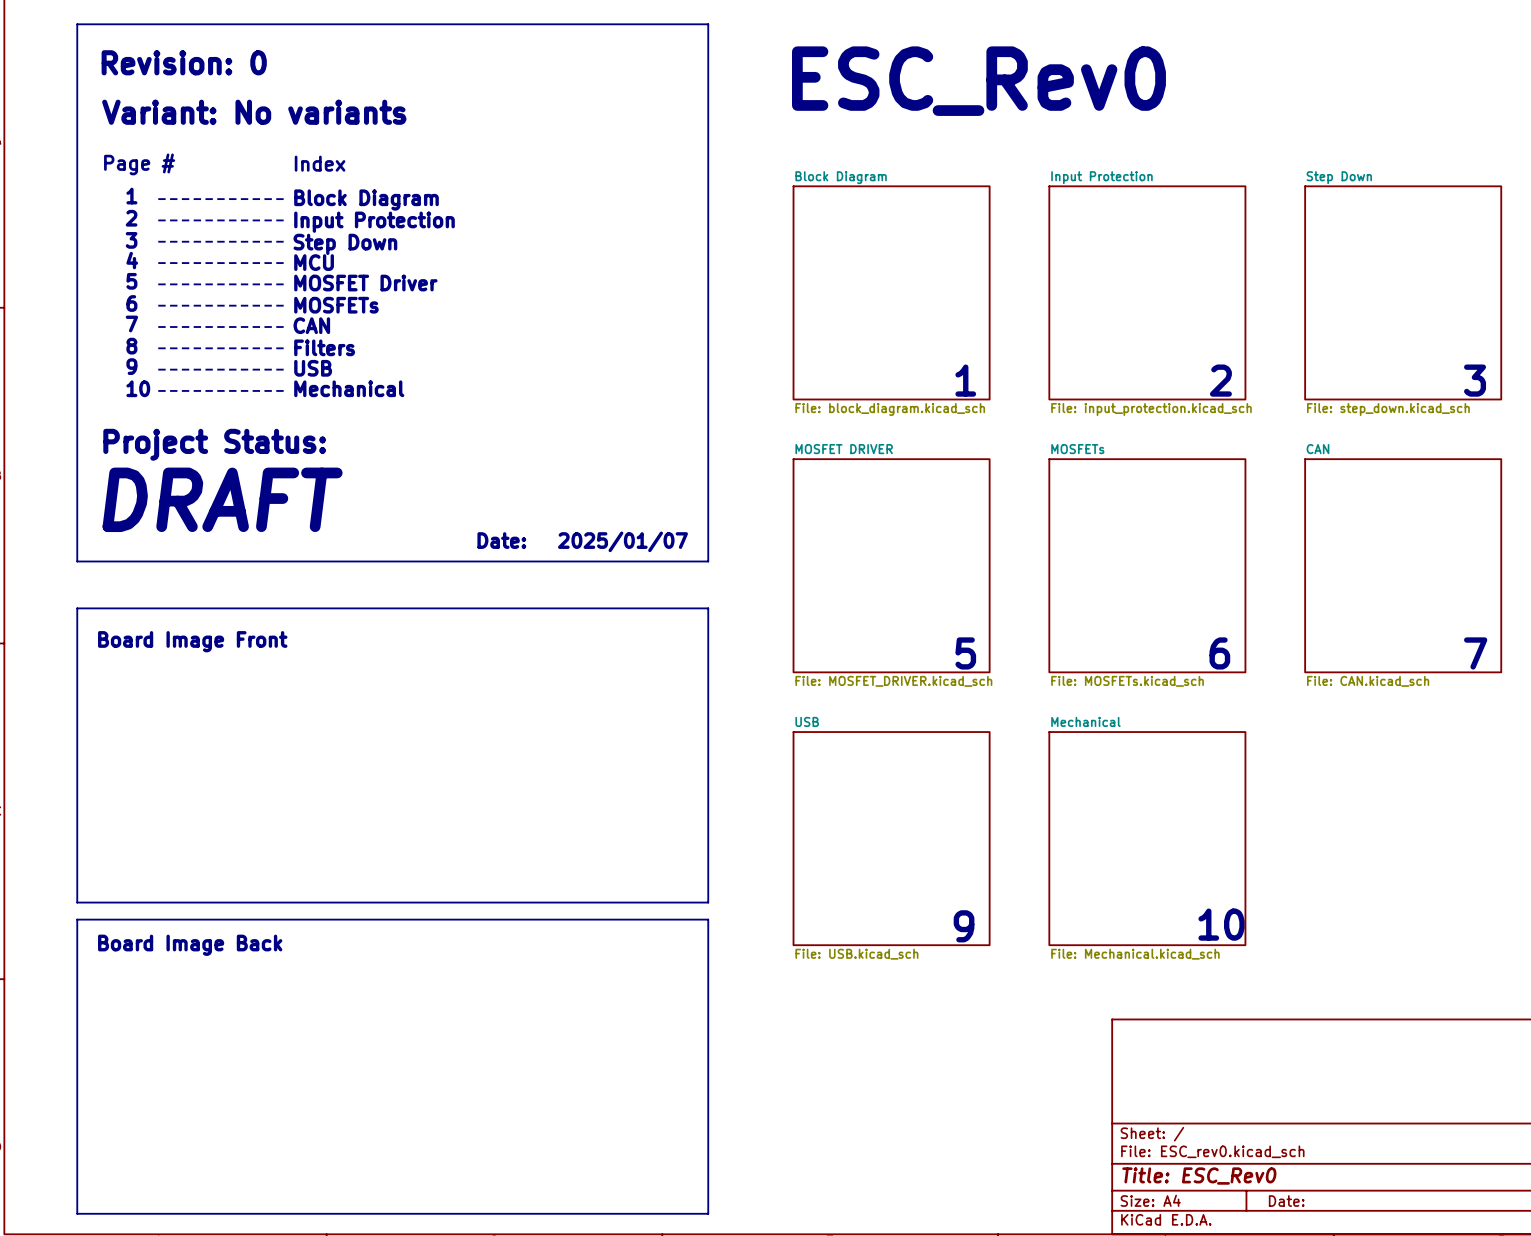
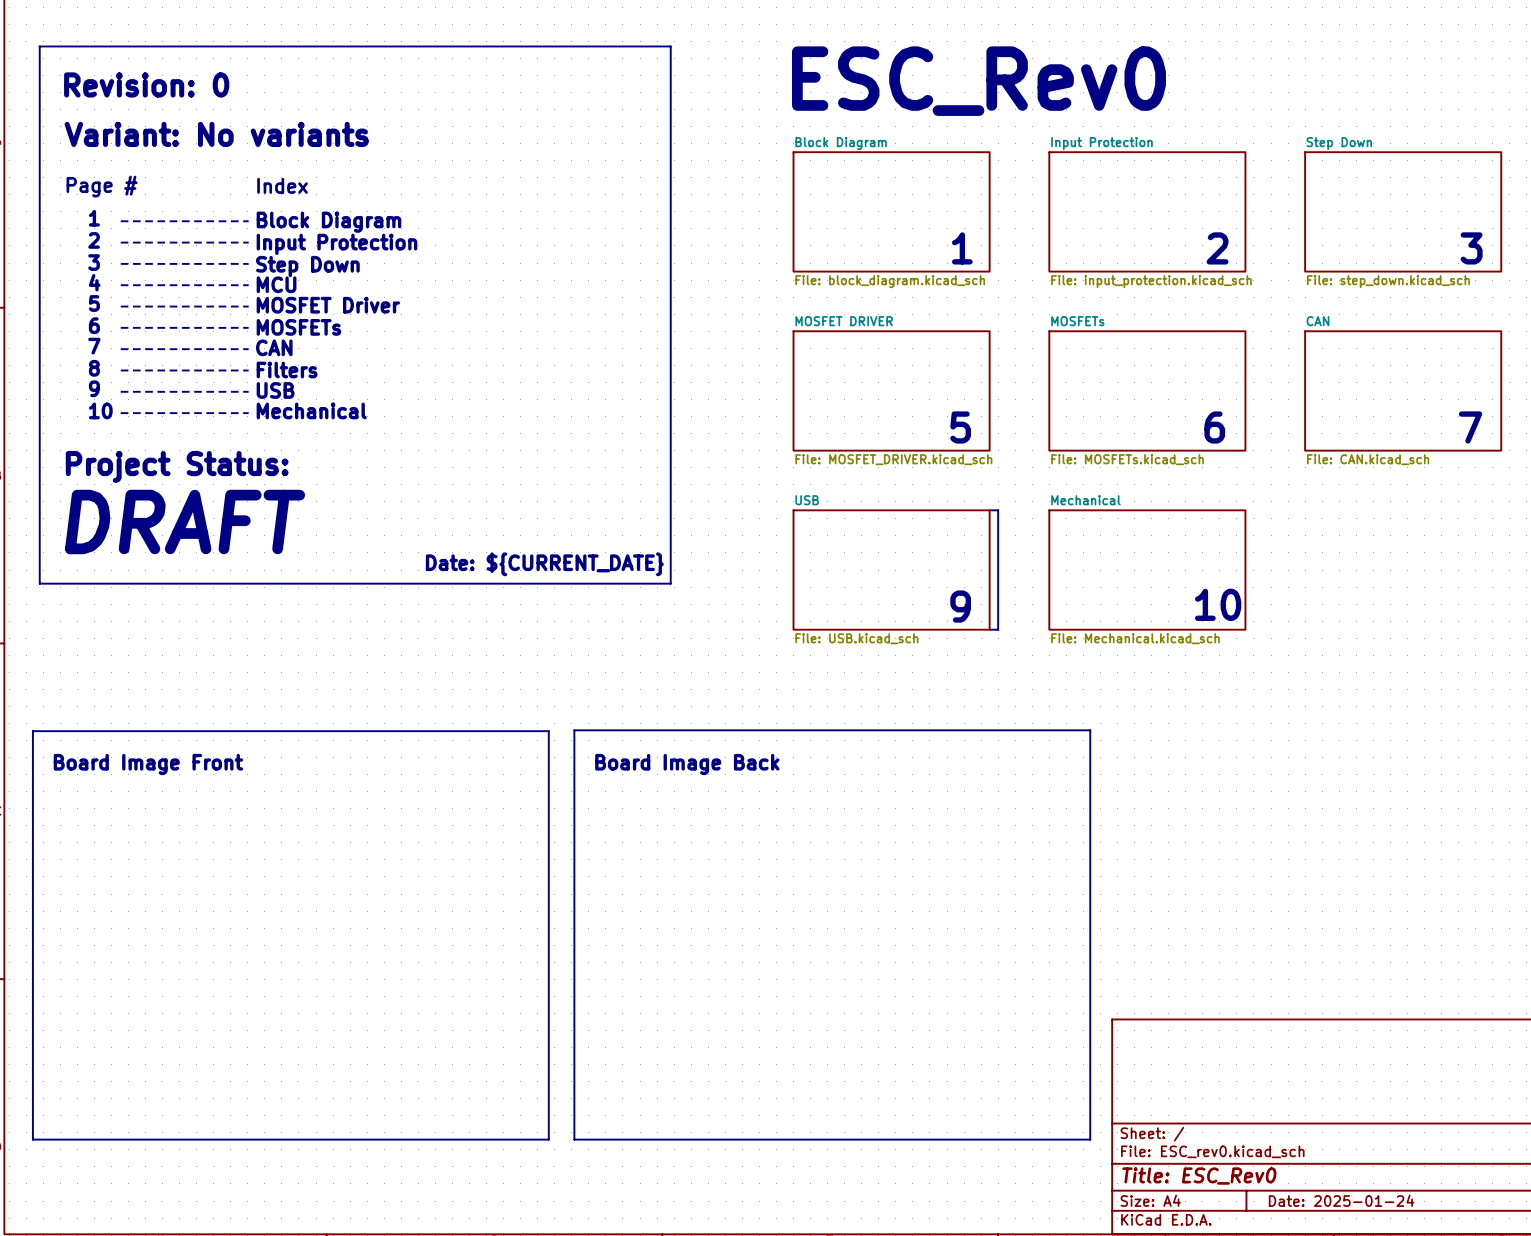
line: (77, 24) (77, 561) (708, 561) (708, 24) (77, 24) -> (39, 46) (39, 583) (670, 583) (670, 46) (39, 46)
text position: Revision: 0 (184, 62) -> Revision: 0 (146, 84)
text position: Variant: No variants (254, 112) -> Variant: No variants (216, 134)
text position: Index (320, 163) -> Index (282, 185)
text position: Page # (139, 164) -> Page # (102, 186)
text position: 1 (131, 196) -> 1 (94, 218)
line: (158, 199) (286, 199) -> (120, 221) (248, 221)
text position: Block Diagram (366, 200) -> Block Diagram (328, 222)
sheet Block Diagram: none -> File: block_diagram.kicad_sch (891, 211)
sheet Input Protection: none -> File: input_protection.kicad_sch (1147, 211)
sheet Step Down: none -> File: step_down.kicad_sch (1403, 211)
text position: 2 (131, 218) -> 2 (94, 240)
line: (158, 220) (286, 220) -> (120, 242) (248, 242)
text position: Input Protection (374, 222) -> Input Protection (336, 244)
text position: 3 (131, 240) -> 3 (94, 262)
line: (158, 241) (286, 241) -> (120, 263) (248, 263)
text position: Step Down (345, 244) -> Step Down (307, 266)
text position: 4 (132, 260) -> 4 (94, 282)
text position: MCU (314, 262) -> MCU (276, 284)
line: (158, 263) (286, 263) -> (120, 285) (248, 285)
text position: 5 (131, 281) -> 5 (94, 303)
text position: MOSFET Driver (365, 283) -> MOSFET Driver (328, 305)
line: (158, 284) (286, 284) -> (120, 306) (248, 306)
sheet Block Diagram: File: block_diagram.kicad_sch (891, 292) -> none
sheet Input Protection: File: input_protection.kicad_sch (1147, 292) -> none
sheet Step Down: File: step_down.kicad_sch (1403, 292) -> none
text position: 6 (131, 303) -> 6 (94, 325)
line: (158, 305) (286, 305) -> (120, 327) (248, 327)
text position: MOSFETs (336, 305) -> MOSFETs (298, 327)
text position: 7 (131, 323) -> 7 (94, 346)
text position: CAN (311, 325) -> CAN (274, 347)
line: (158, 327) (286, 327) -> (120, 349) (248, 349)
text position: 8 (131, 346) -> 8 (94, 368)
text position: Filters (324, 347) -> Filters (287, 370)
line: (158, 348) (286, 348) -> (120, 370) (248, 370)
text position: 9 (131, 366) -> 9 (94, 388)
text position: USB (313, 368) -> USB (275, 390)
line: (158, 369) (286, 369) -> (120, 391) (248, 391)
text position: 1 (965, 380) -> 1 (962, 248)
text position: 2 (1220, 380) -> 2 (1217, 248)
text position: 3 (1475, 380) -> 3 (1471, 248)
text position: 10 (138, 388) -> 10 (100, 410)
text position: Mechanical (349, 388) -> Mechanical (311, 410)
line: (158, 390) (286, 390) -> (120, 413) (248, 413)
sheet MOSFET DRIVER: none -> File: MOSFET_DRIVER.kicad_sch (891, 390)
sheet MOSFETs: none -> File: MOSFETs.kicad_sch (1147, 390)
sheet CAN: none -> File: CAN.kicad_sch (1403, 390)
text: none -> 5 (960, 427)
text: none -> 6 (1214, 427)
text: none -> 7 (1470, 427)
text position: Project Status: (214, 444) -> Project Status: (177, 466)
text position: DRAFT (222, 499) -> DRAFT (185, 521)
line: none -> (989, 510) (998, 510) (998, 629) (989, 629)
text: Date: 2025/01/07 (582, 541) -> none
text: none -> Date: ${CURRENT_DATE} (544, 564)
sheet MOSFET DRIVER: File: MOSFET_DRIVER.kicad_sch (891, 565) -> none
sheet MOSFETs: File: MOSFETs.kicad_sch (1147, 565) -> none
sheet CAN: File: CAN.kicad_sch (1403, 565) -> none
sheet USB: none -> File: USB.kicad_sch (891, 570)
sheet Mechanical: none -> File: Mechanical.kicad_sch (1147, 570)
text: none -> 10 (1218, 604)
text: none -> 9 (960, 606)
line: (77, 608) (708, 608) (708, 902) (77, 902) (77, 608) -> none
text position: Board Image Front (192, 641) -> Board Image Front (148, 764)
text: 5 (965, 653) -> none
text: 6 (1219, 653) -> none
text: 7 (1475, 653) -> none
line: none -> (574, 730) (1090, 730) (1090, 1139) (574, 1139) (574, 730)
line: none -> (32, 731) (548, 731) (548, 1139) (32, 1139) (32, 731)
text: none -> Board Image Back (687, 764)
sheet USB: File: USB.kicad_sch (891, 838) -> none
sheet Mechanical: File: Mechanical.kicad_sch (1147, 838) -> none
line: (77, 919) (77, 1213) (708, 1213) (708, 919) (77, 919) -> none
text: 10 (1221, 924) -> none
text: 9 (964, 926) -> none
text: Board Image Back (190, 945) -> none
title block: Date: (1286, 1201) -> Date: 2025-01-24 (1341, 1200)

